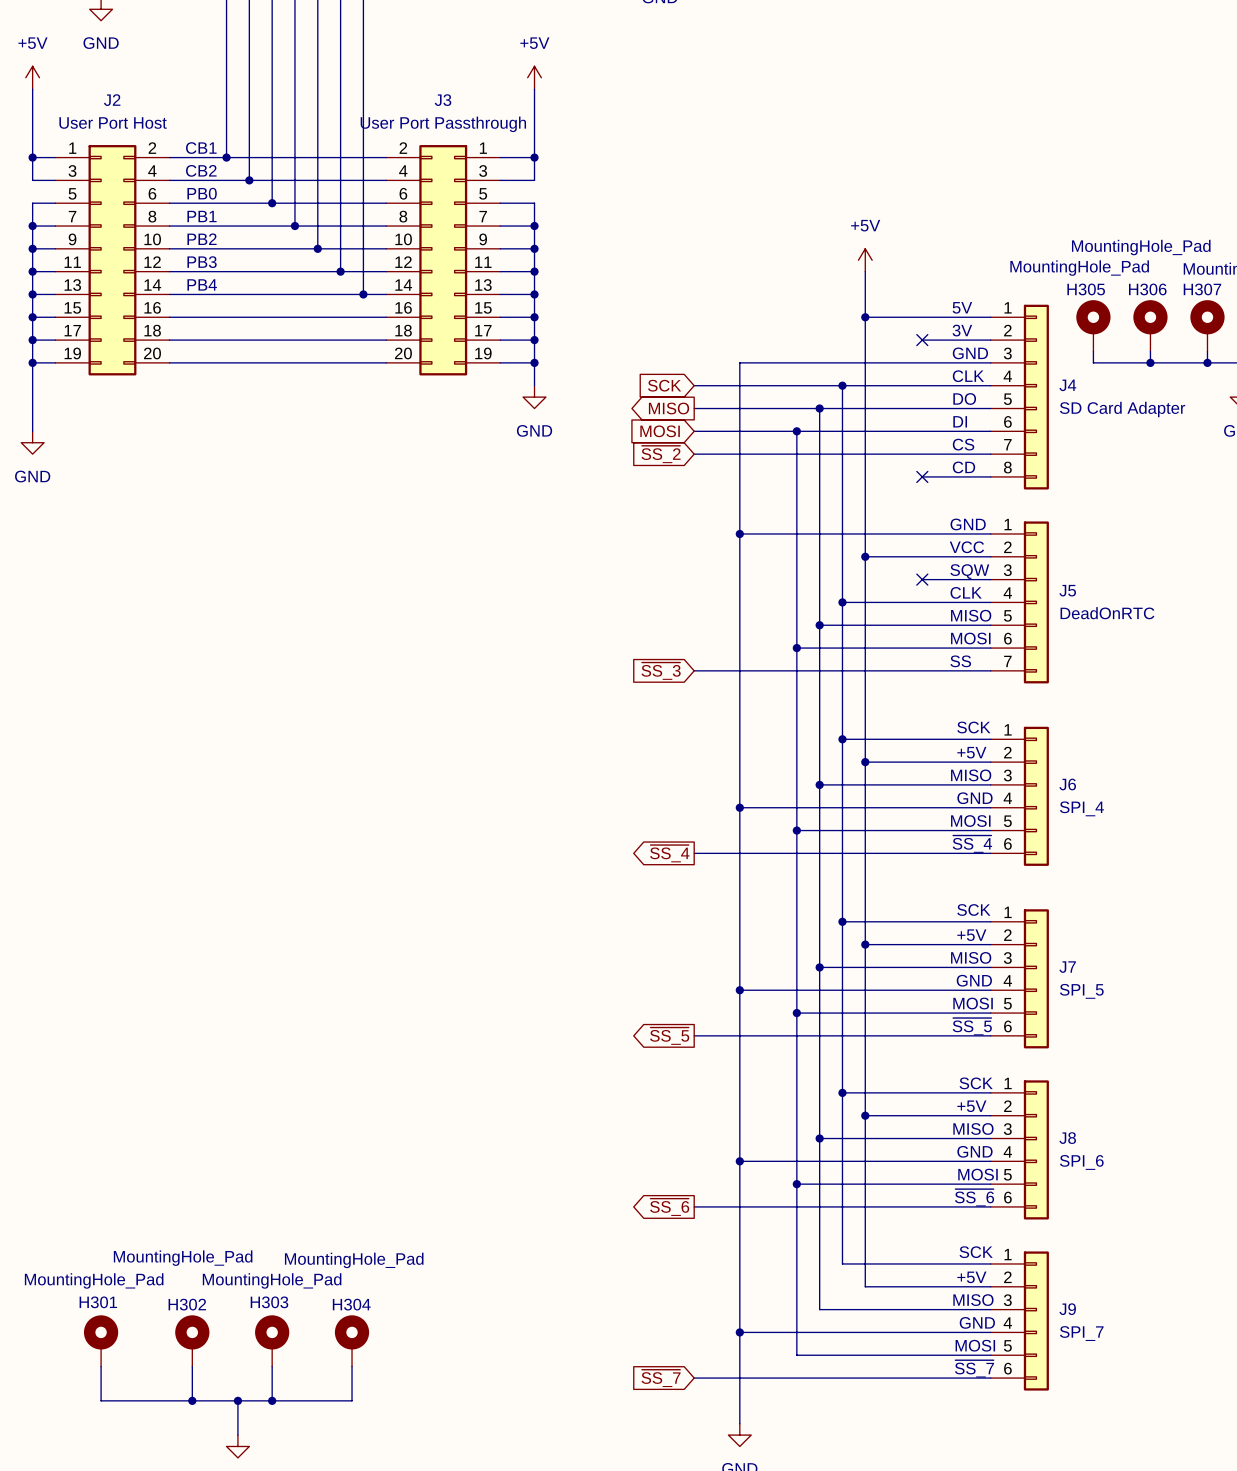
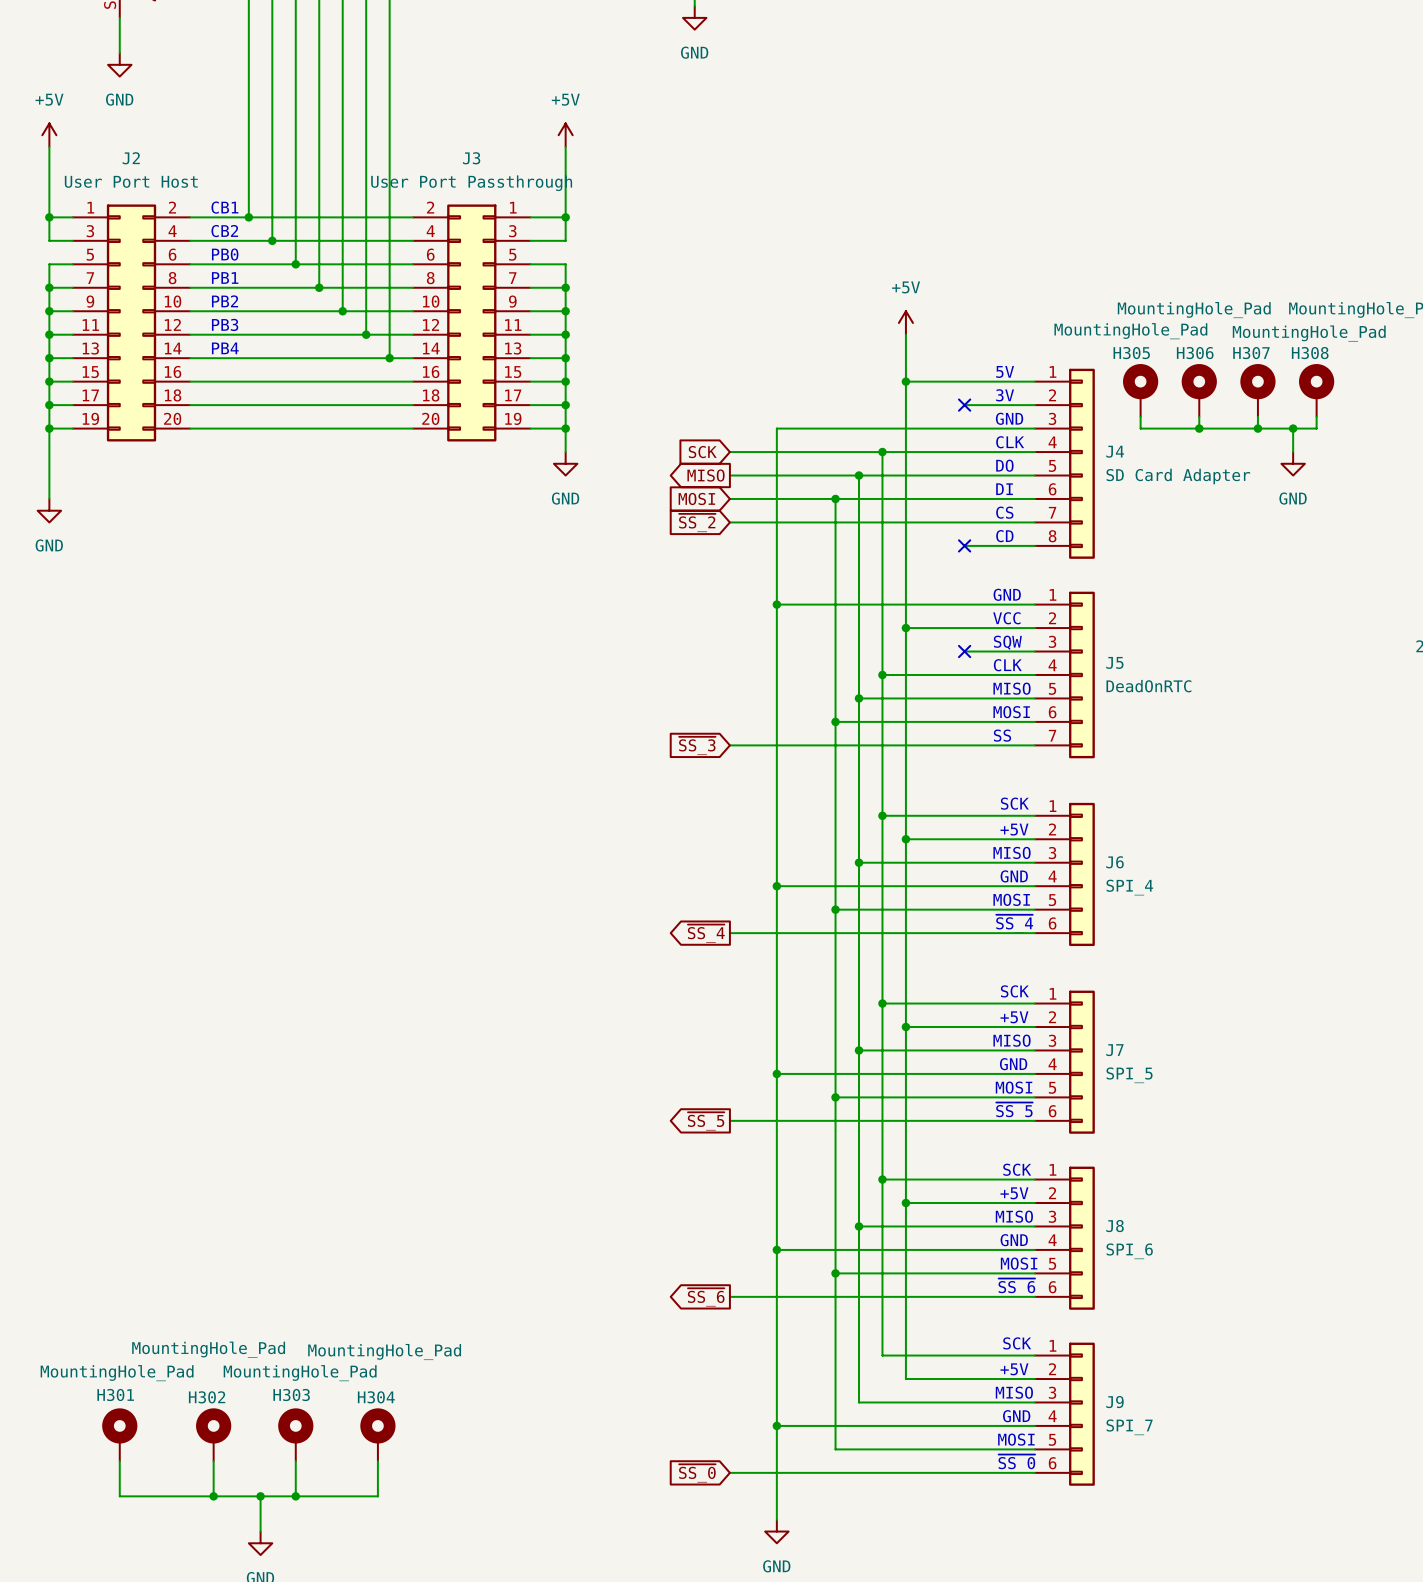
text: ~{SS_7} (974, 1368) -> ~{SS_0} (1016, 1463)
global label: ~{SS_7} (661, 1378) -> ~{SS_0} (697, 1473)

